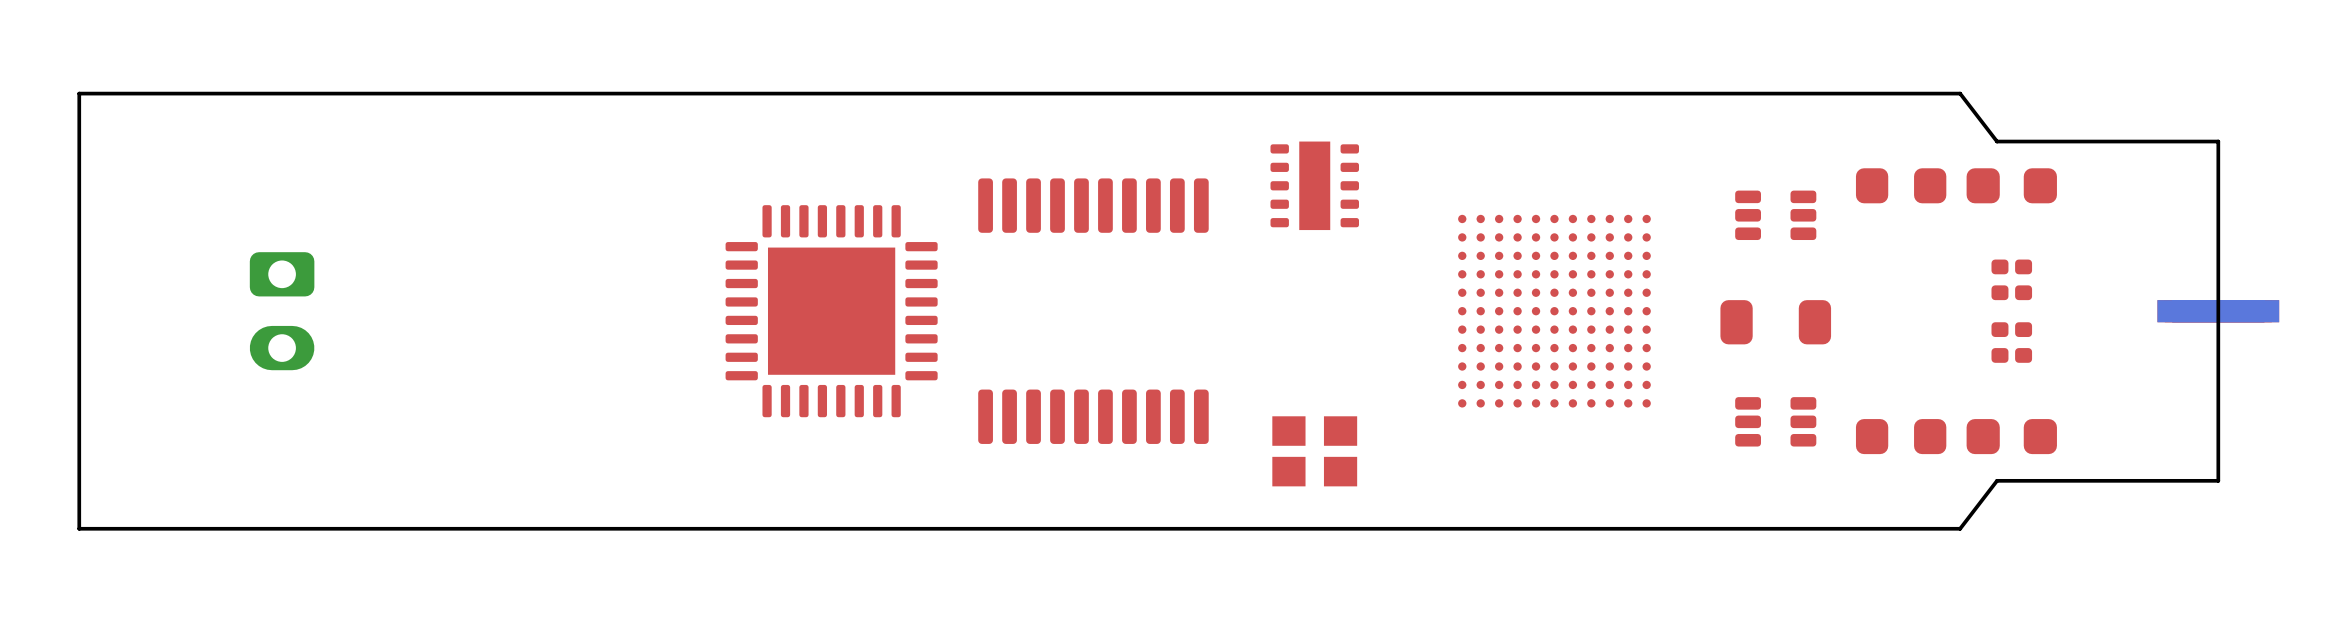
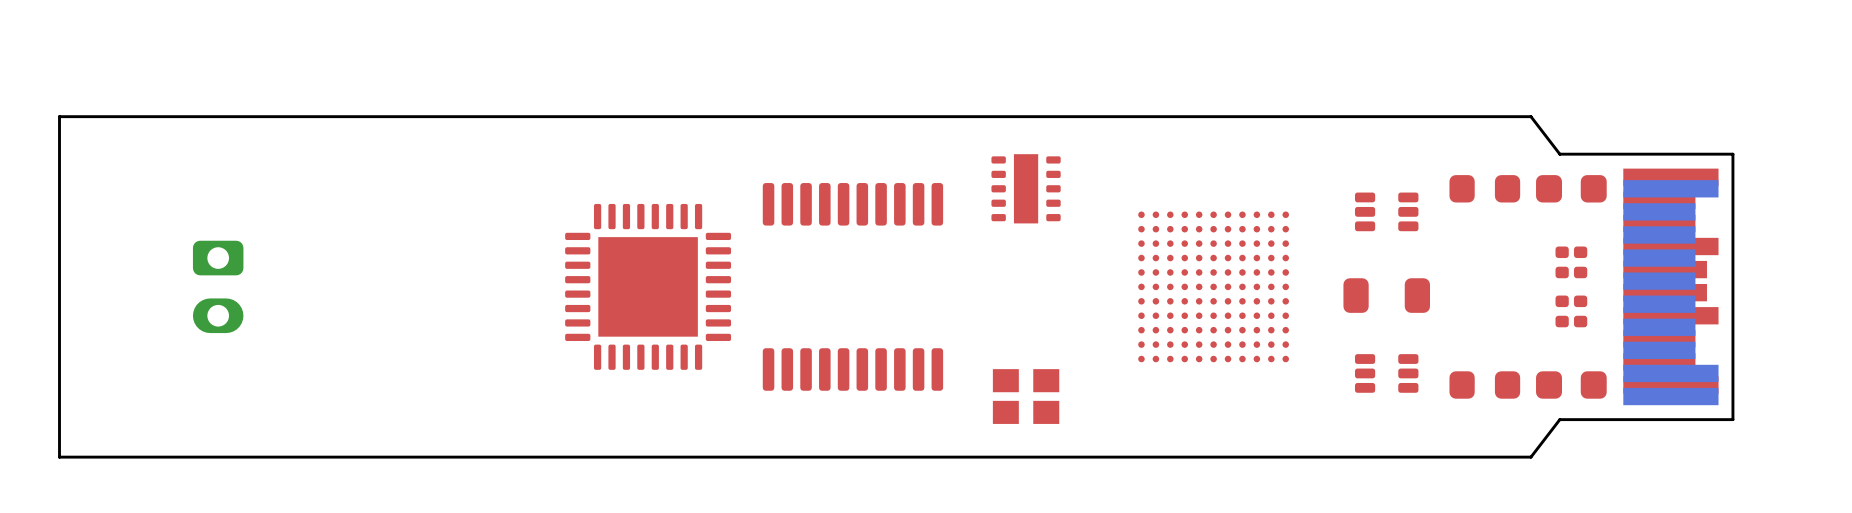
part: none -> (1670, 286)
part: (2218, 311) -> none

